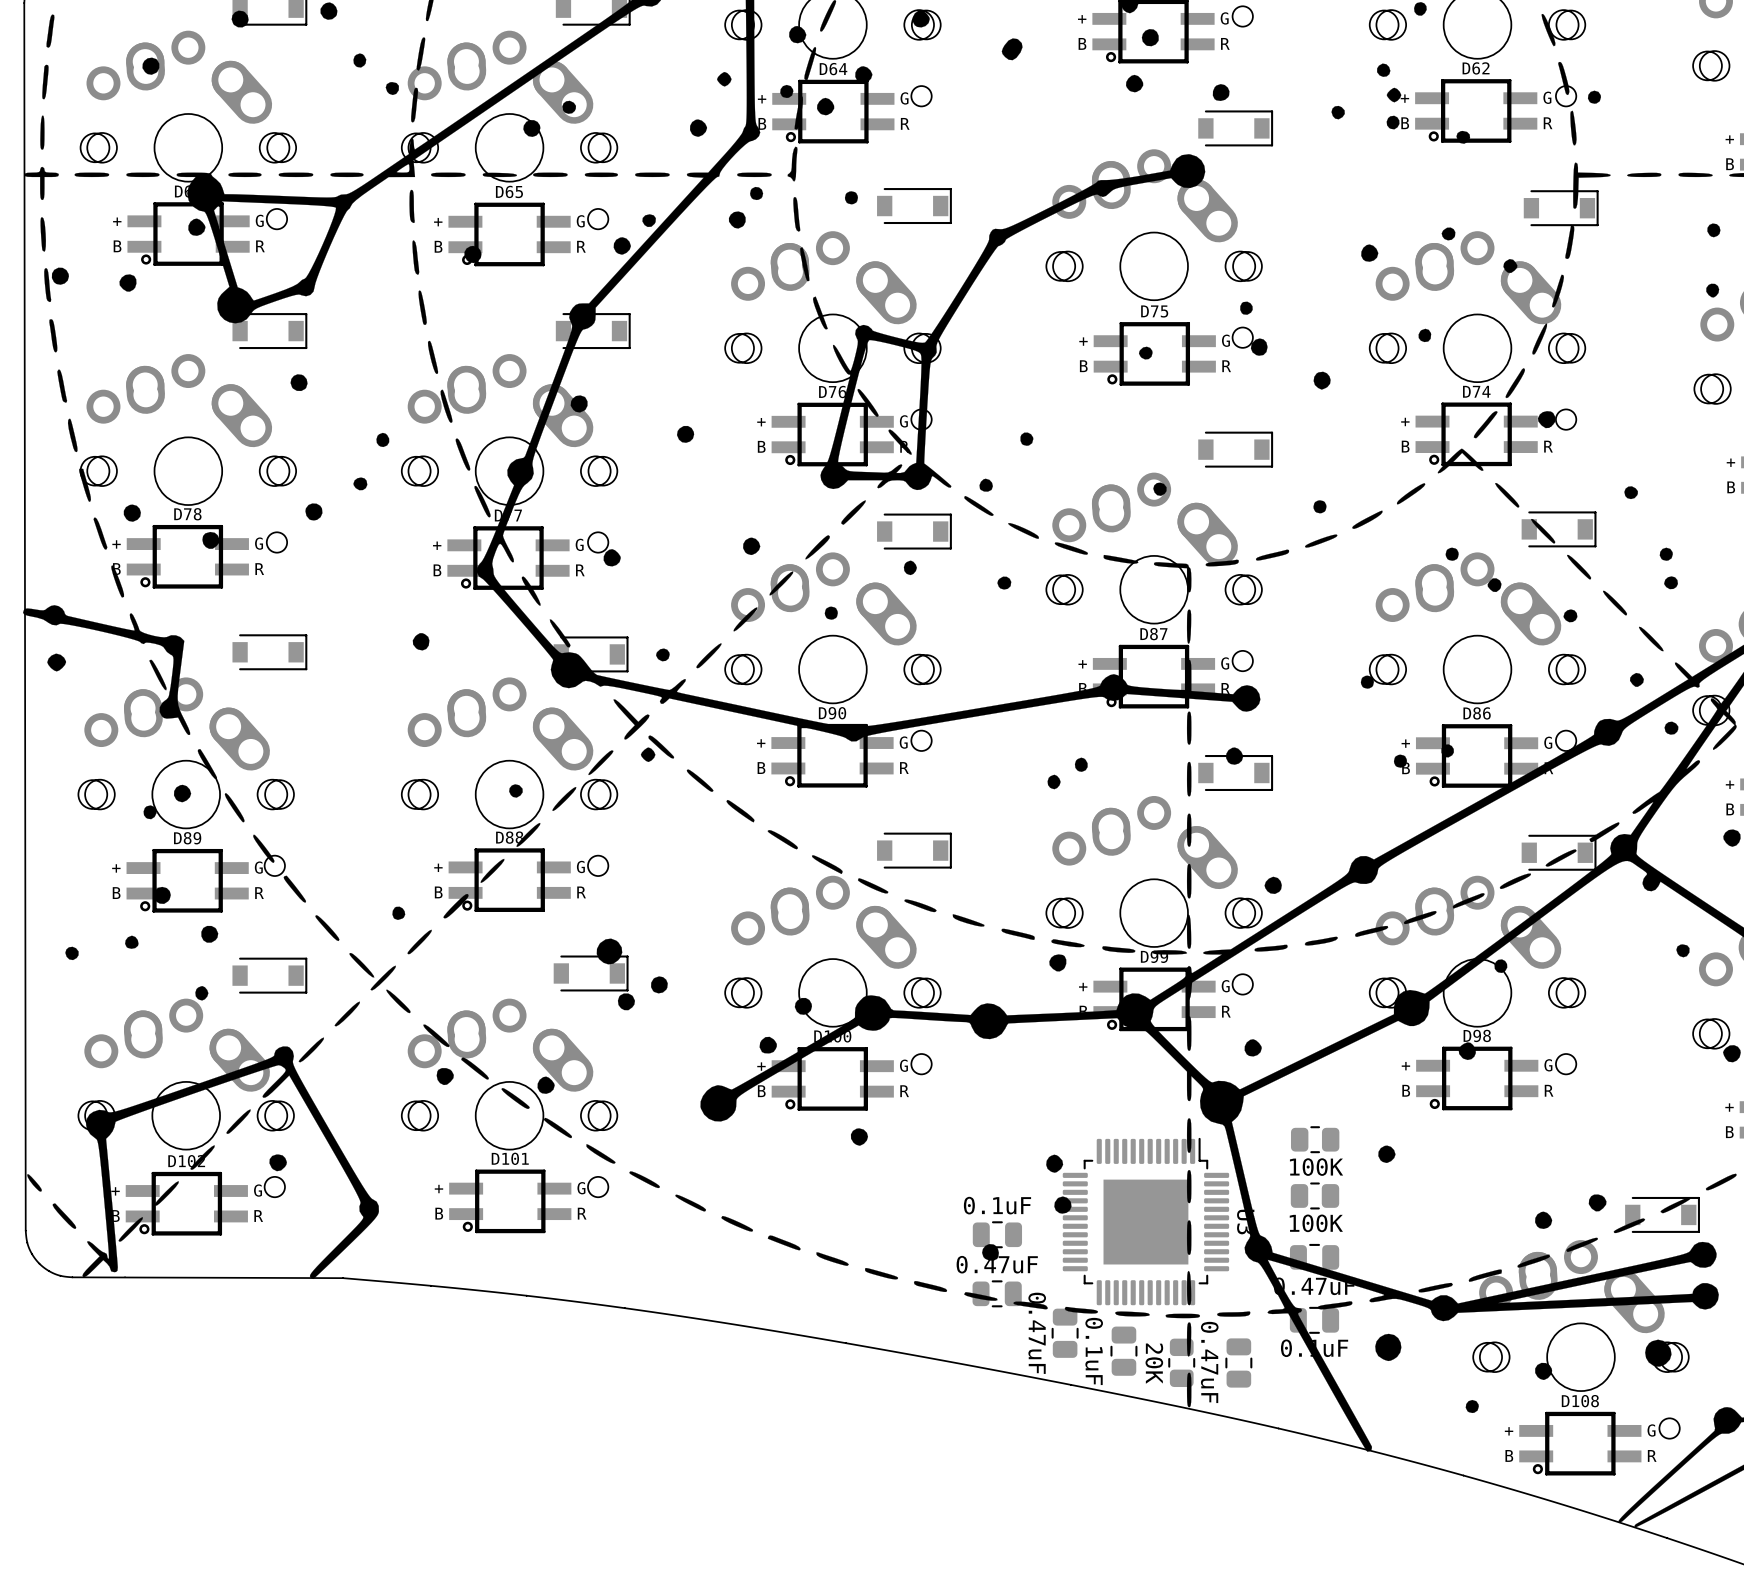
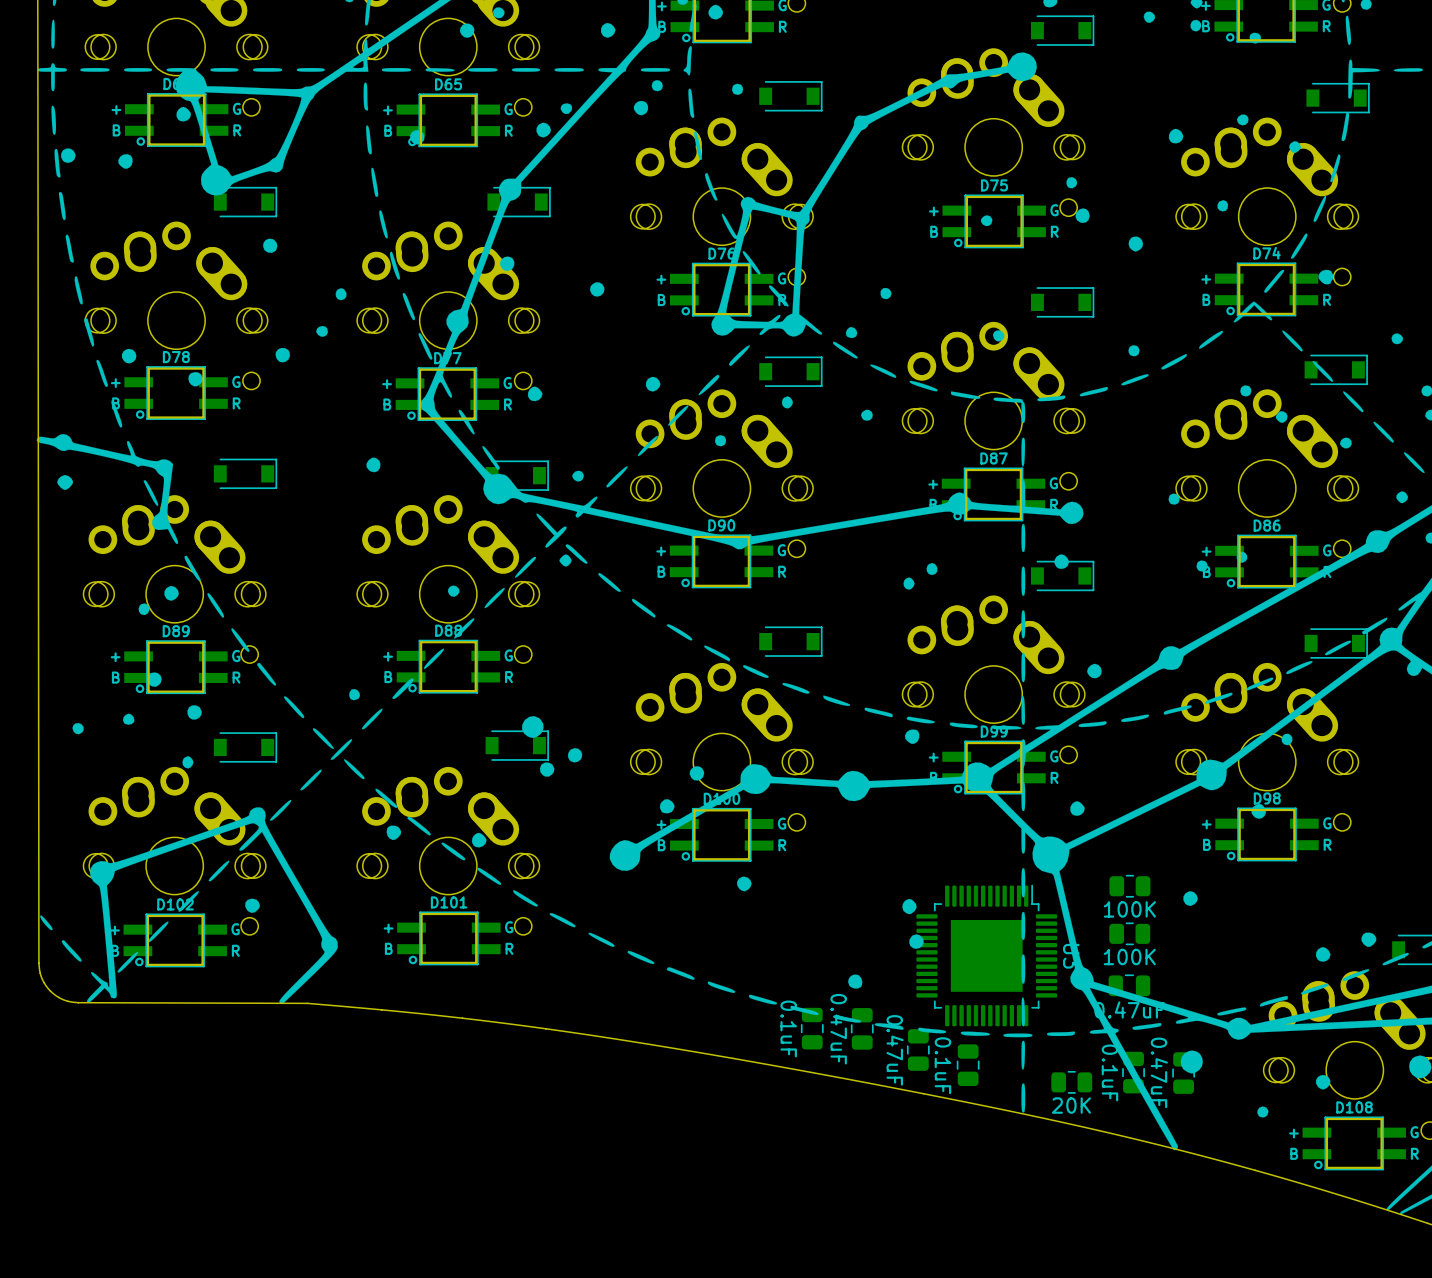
part value position: 0.1uF (997, 1205) -> 0.1uF (788, 1028)
part rotation: 0° (997, 1234) -> 90° clockwise (812, 1028)
part position: (997, 1234) -> (812, 1028)
part value position: 0.47uF (997, 1264) -> 0.47uF (839, 1029)
part rotation: 0° (997, 1293) -> 90° clockwise (862, 1028)
part rotation: 0° (1314, 1320) -> 90° clockwise (1133, 1072)
part position: (1314, 1320) -> (1133, 1072)
part footprint: [1225, 1338, 1253, 1388] -> [1051, 1070, 1093, 1094]
part: none -> 0.47uF (1183, 1073)
part: 20K (1181, 1362) -> none
part value: 0.47uF (1209, 1362) -> 20K (1071, 1105)

